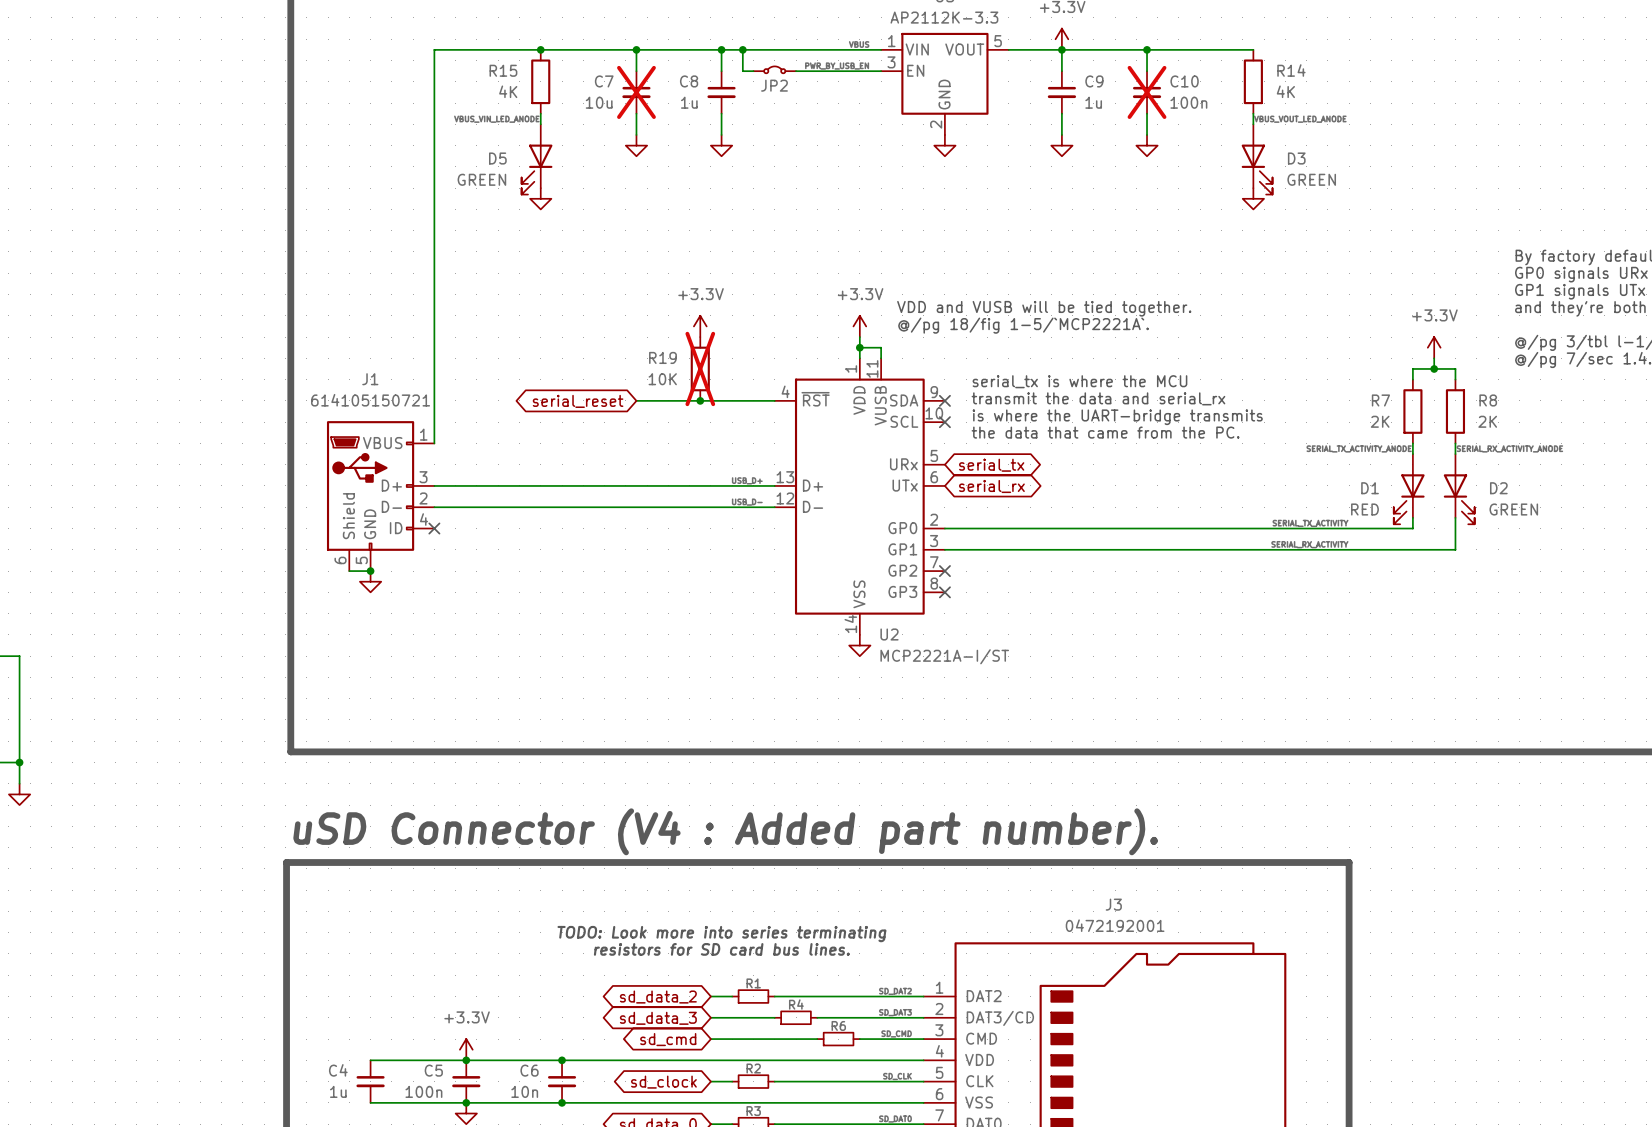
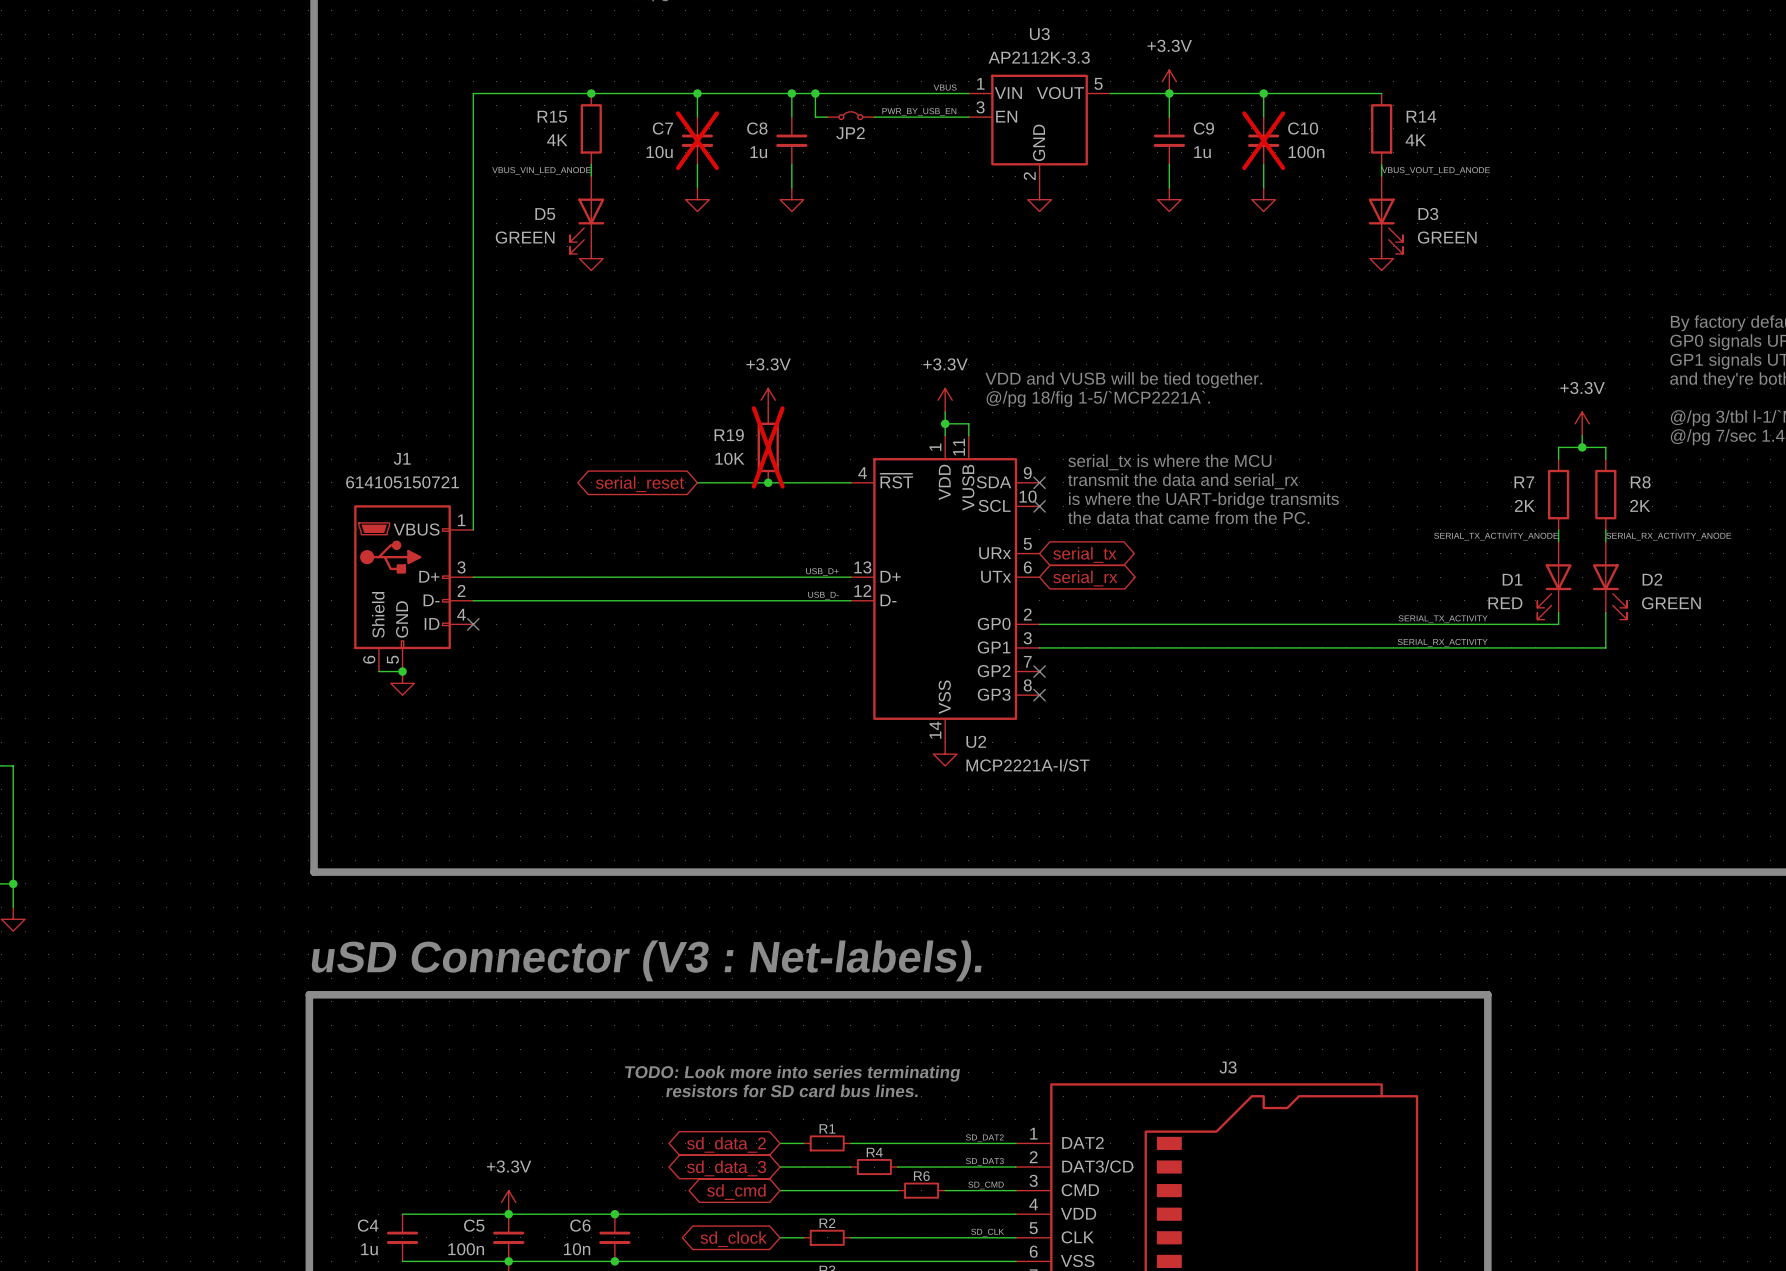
text: uSD Connector (V4 : Added part number). (725, 831) -> uSD Connector (V3 : Net-labels). (646, 960)
J3 name position: J3 (1113, 904) -> J3 (1228, 1067)
J3 value: 0472192001 (1115, 925) -> none

